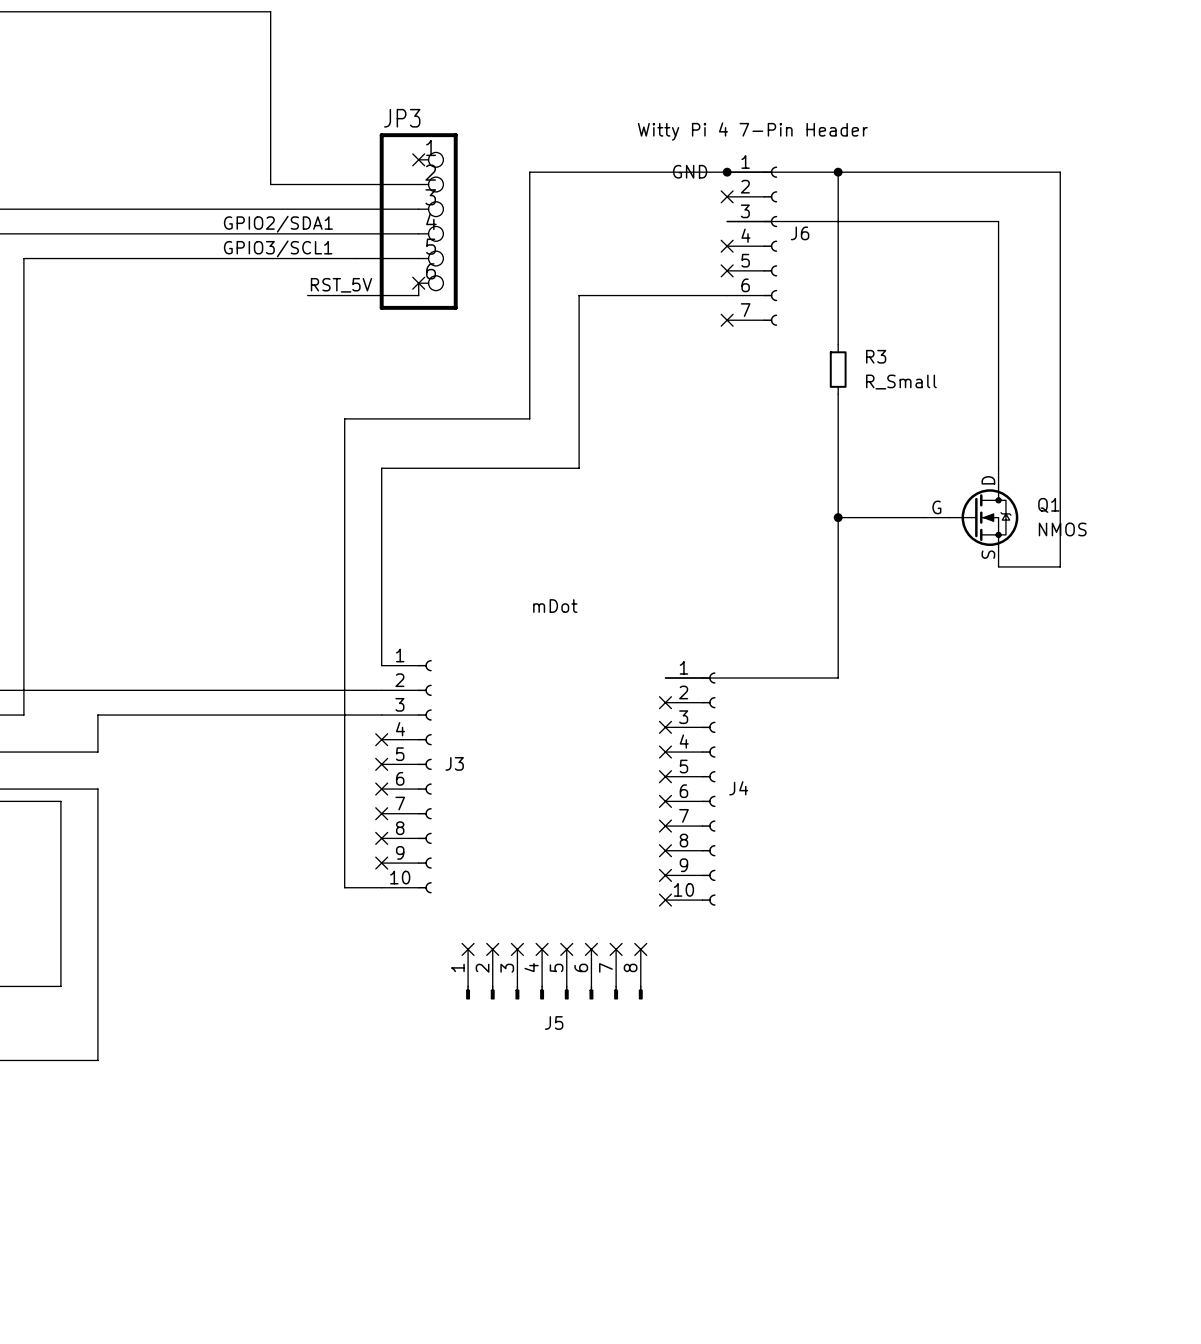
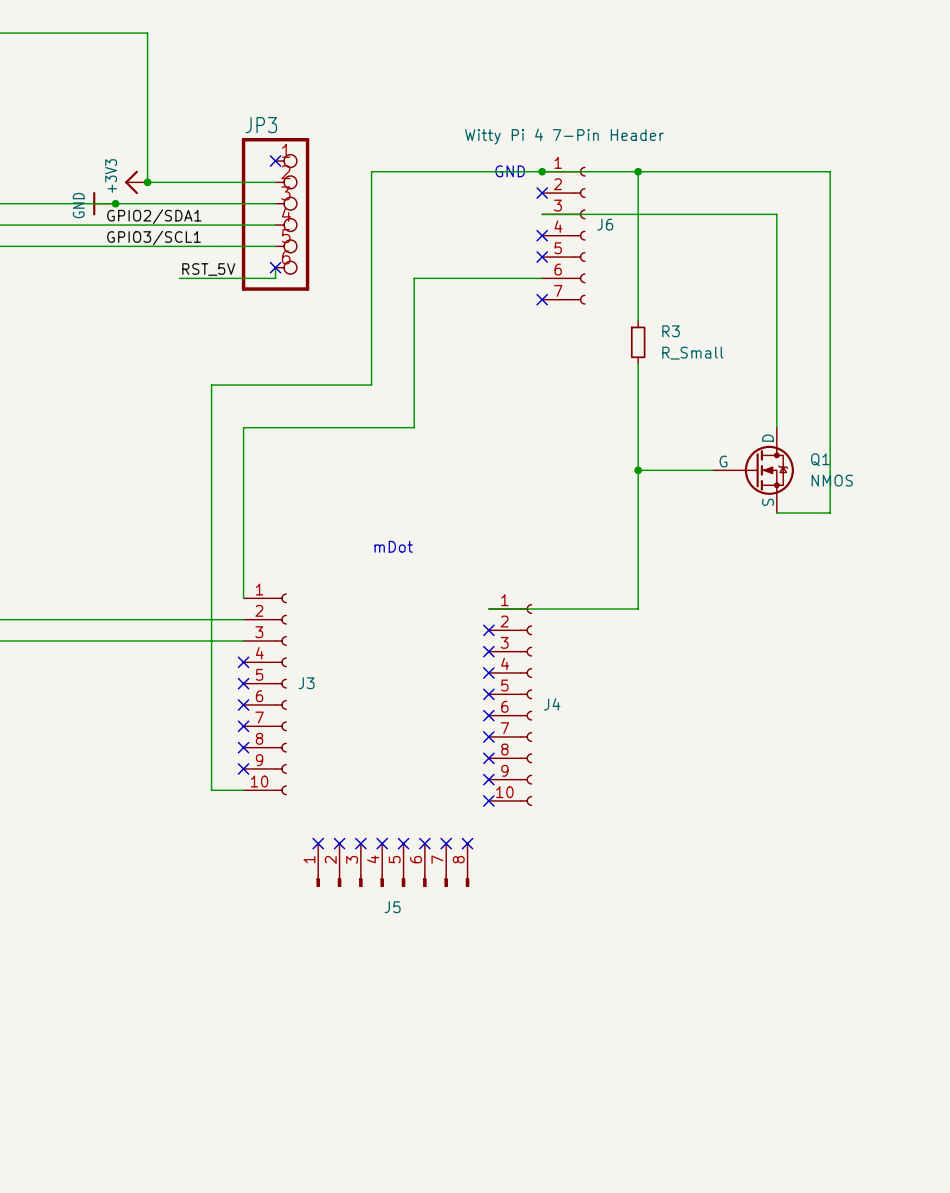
power symbol: none -> +3V3 (136, 182)
junction: none -> (147, 182)
power symbol: none -> GND (104, 203)
junction: none -> (115, 203)

